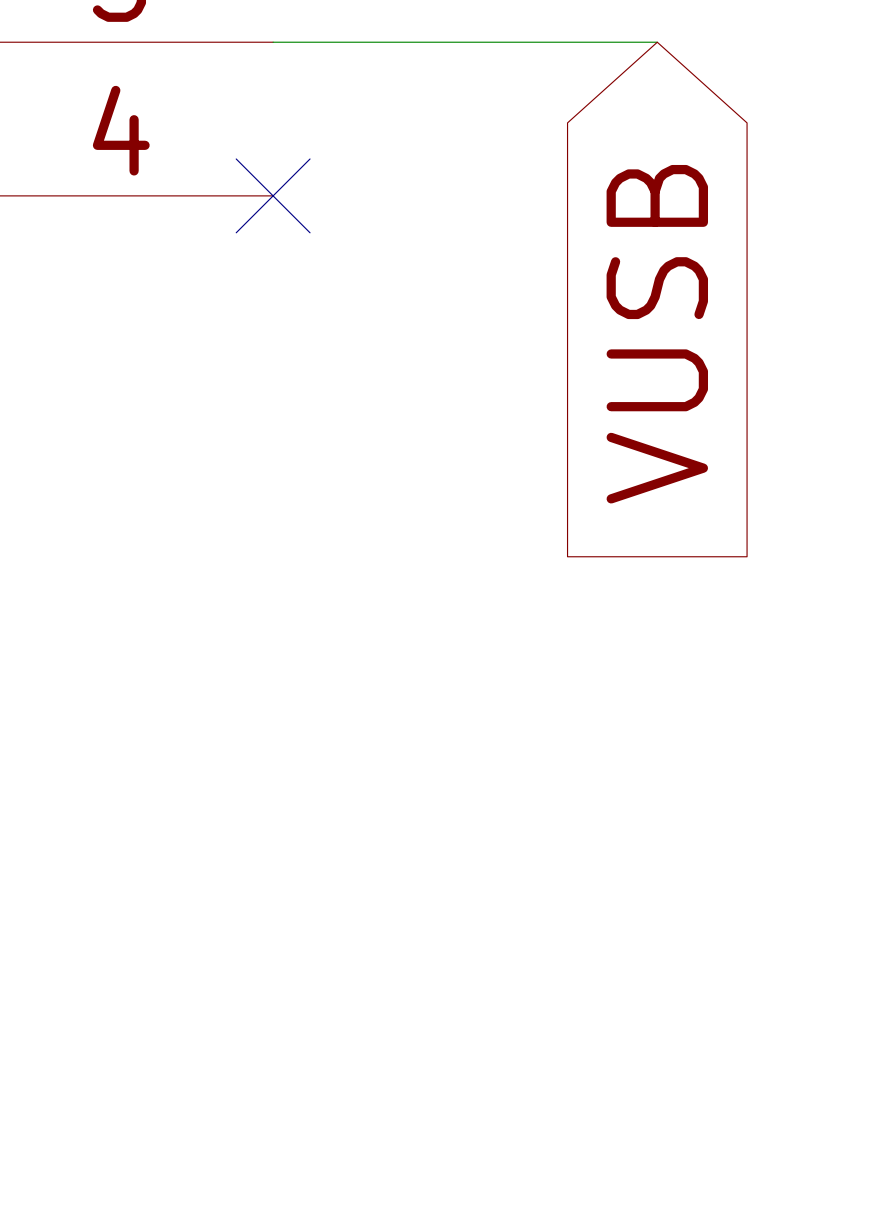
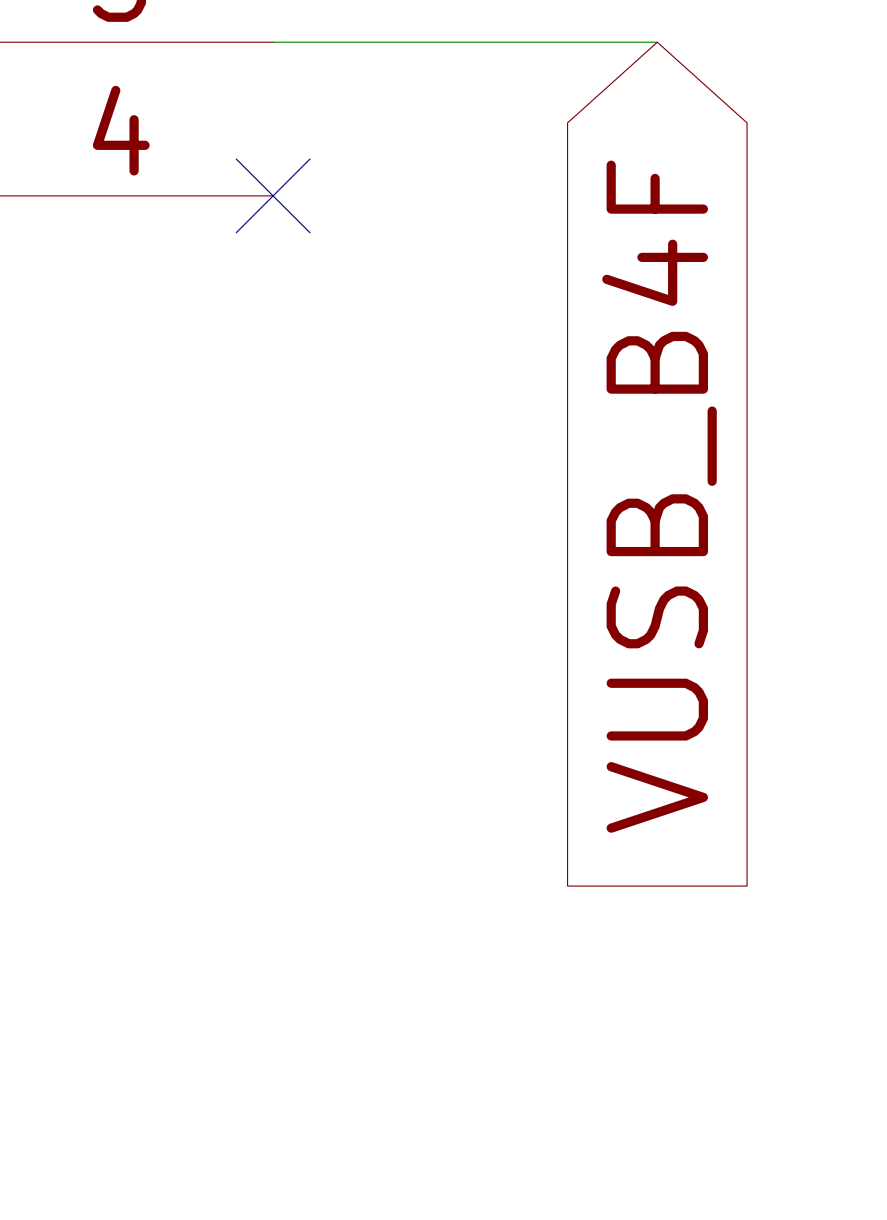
global label: VUSB (657, 334) -> VUSB_B4F (659, 496)

